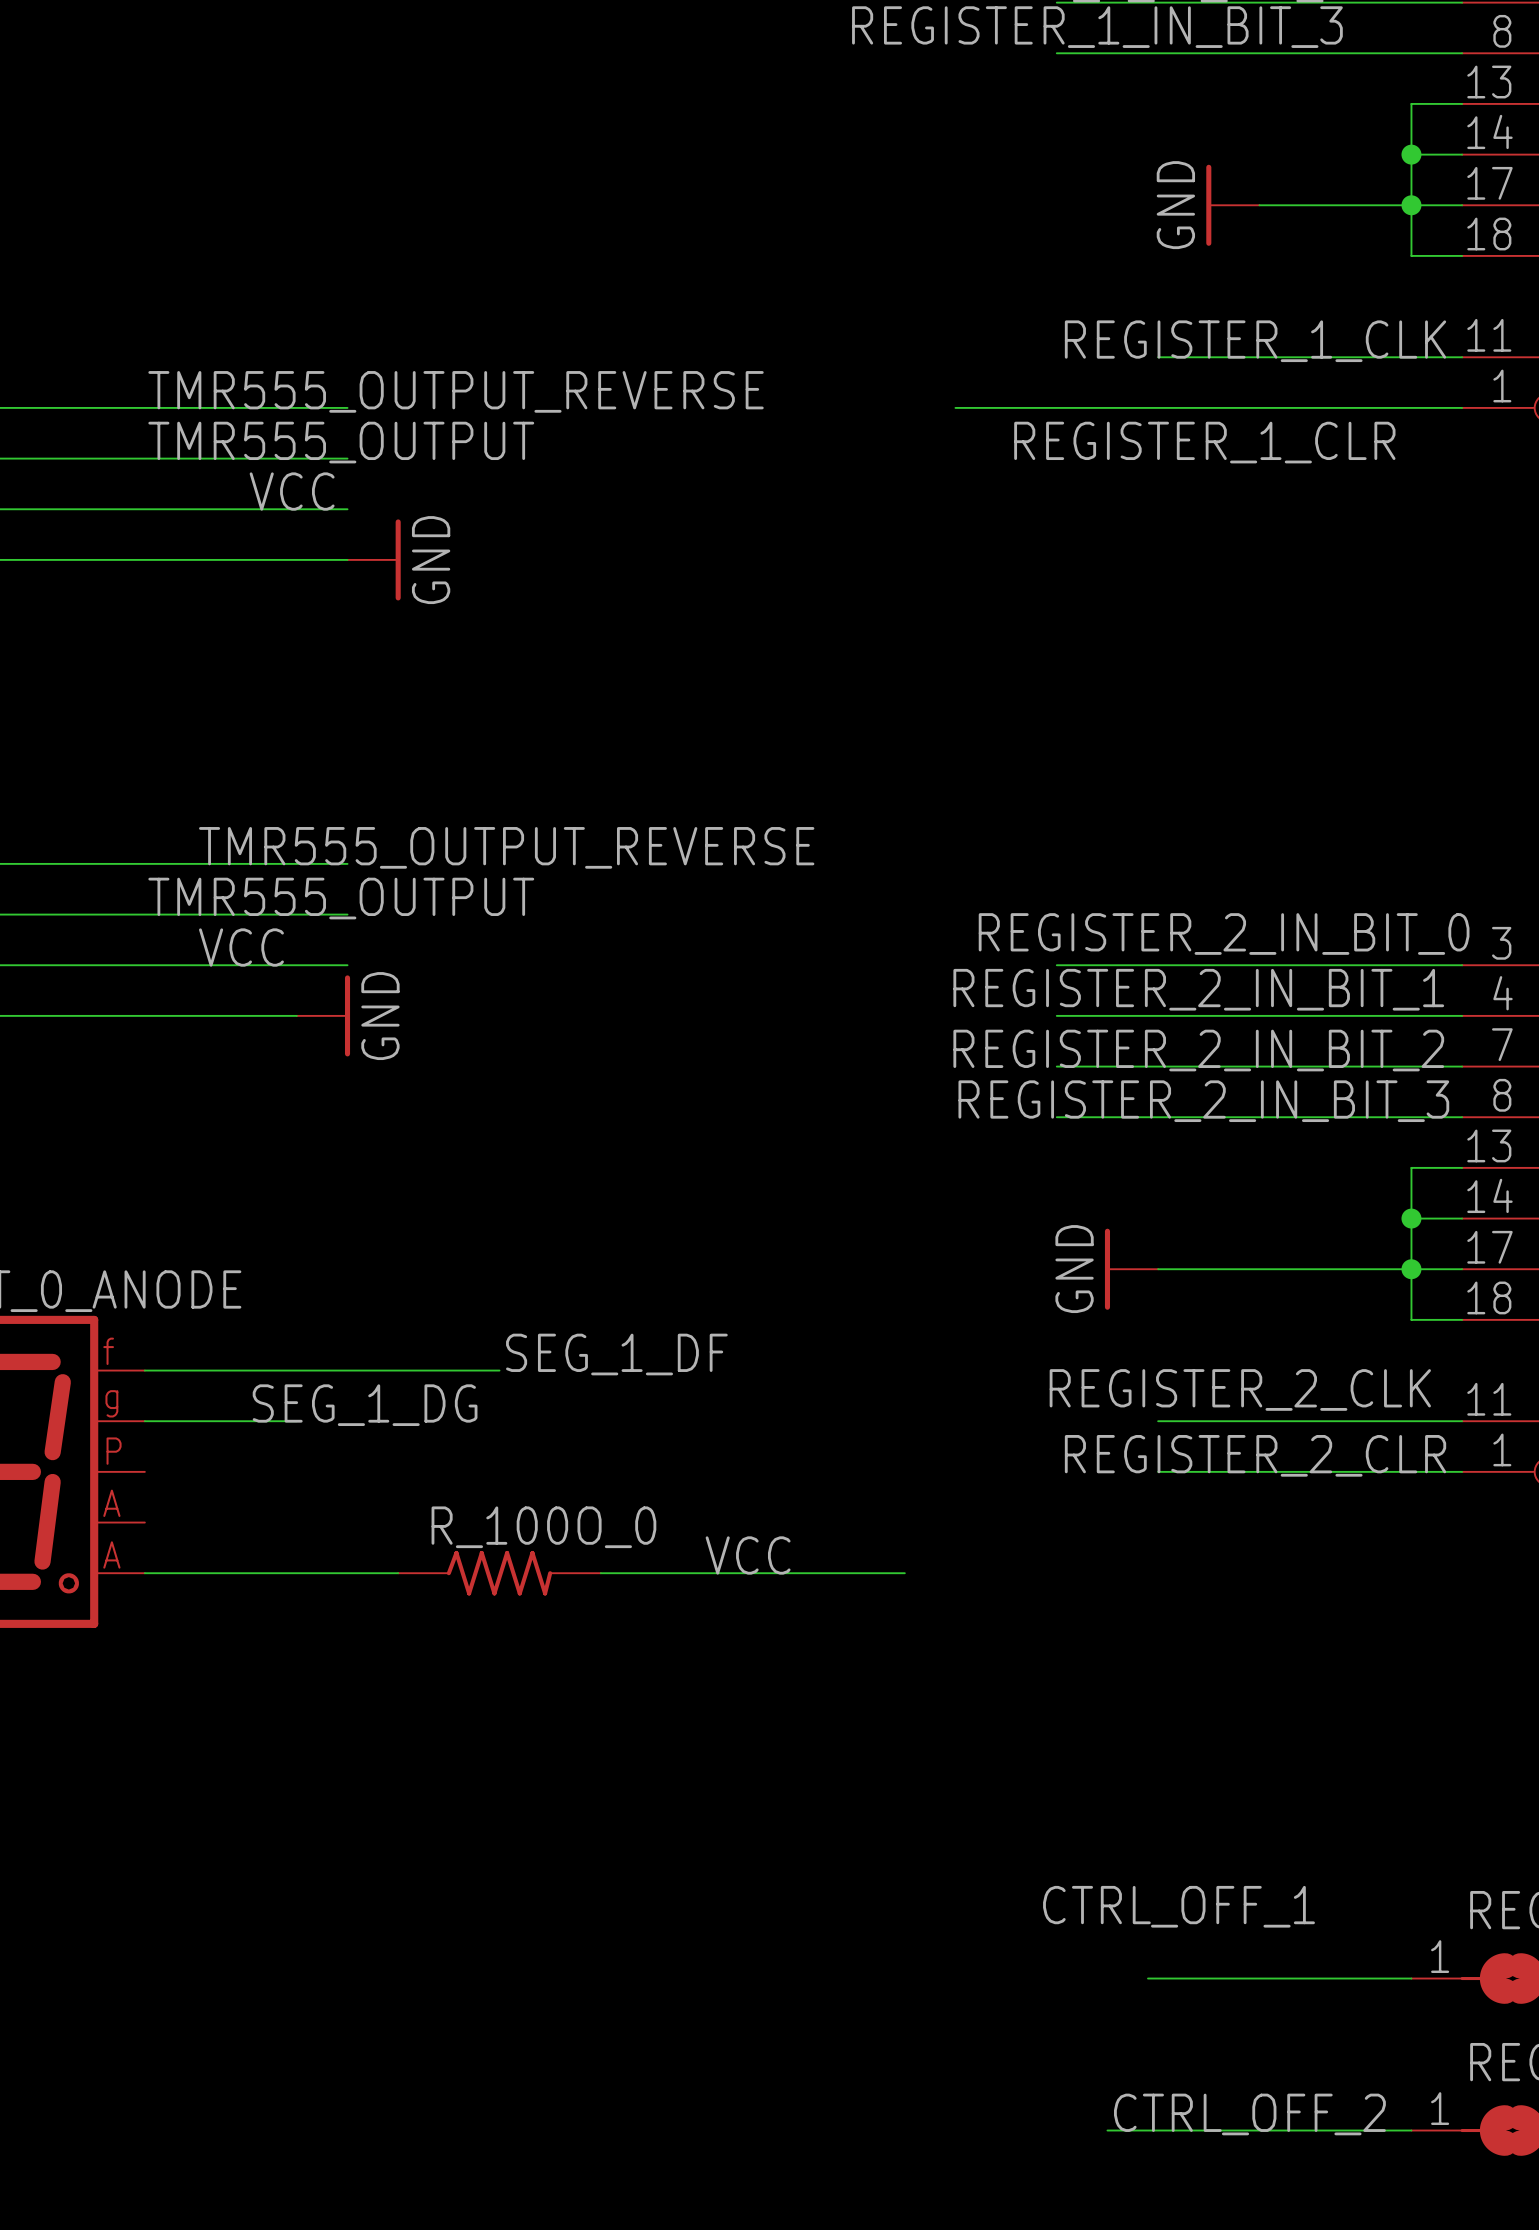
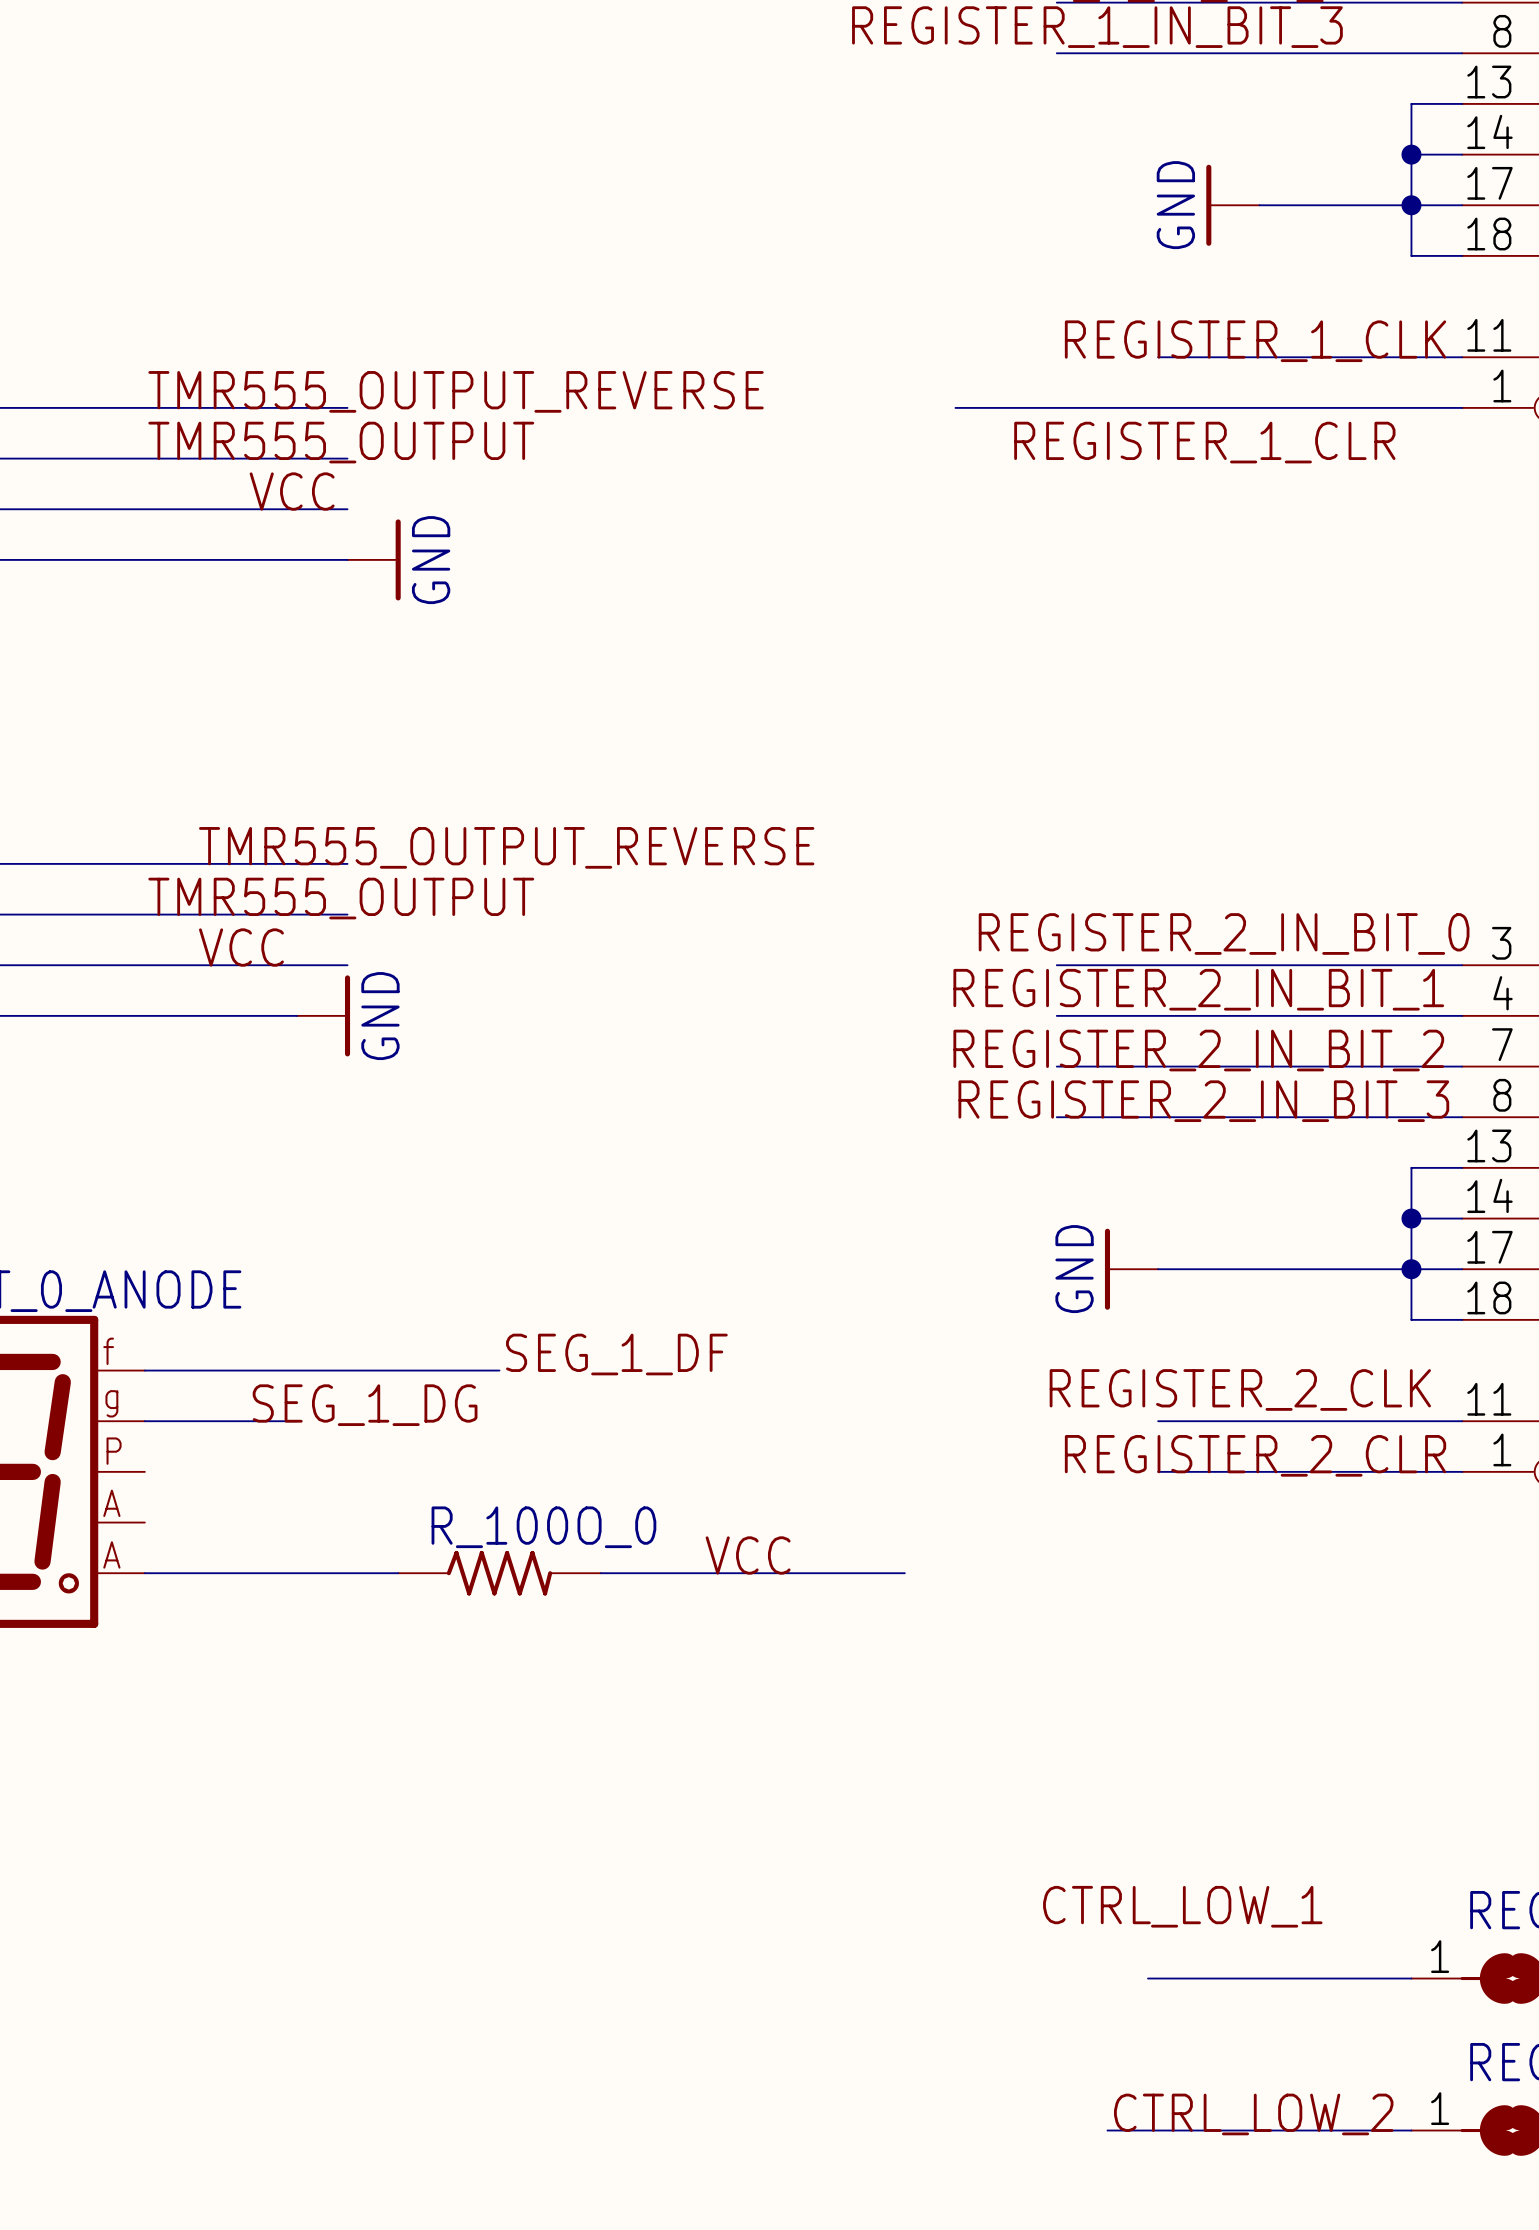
label: CTRL_OFF_1 (1179, 1906) -> CTRL_LOW_1 (1182, 1906)
label: CTRL_OFF_2 (1249, 2114) -> CTRL_LOW_2 (1253, 2114)

